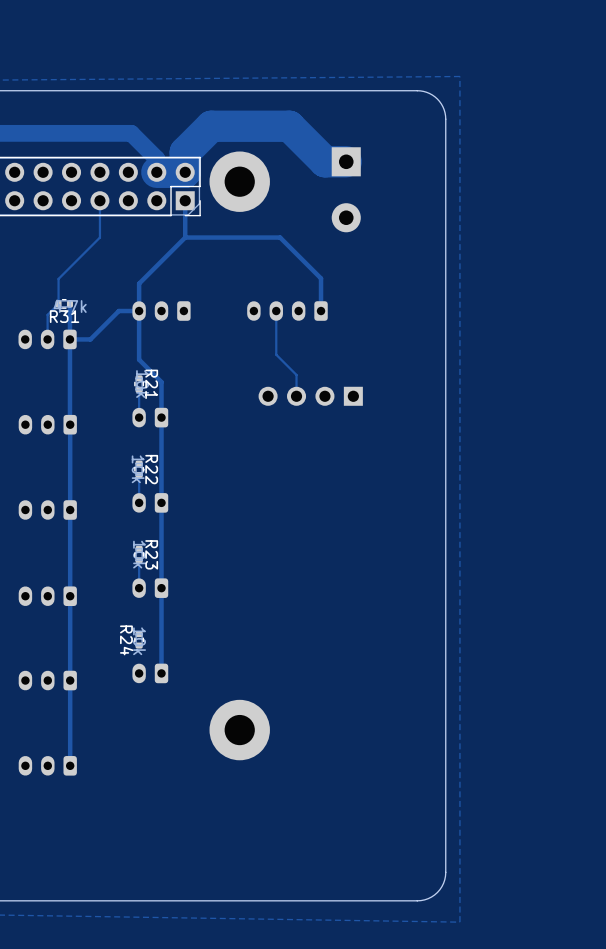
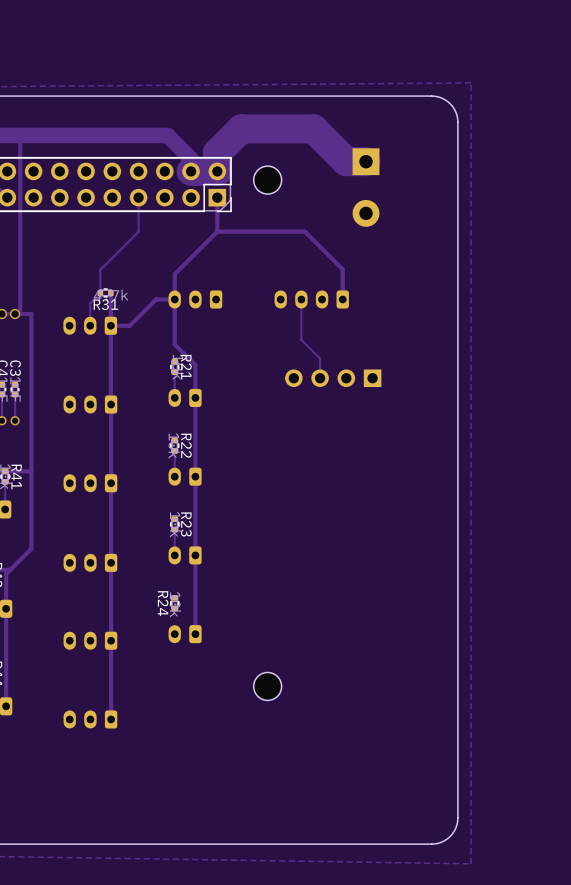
part footprint: [209, 151, 270, 212] -> [253, 166, 282, 195]
part footprint: [209, 699, 270, 761] -> [253, 672, 282, 701]

